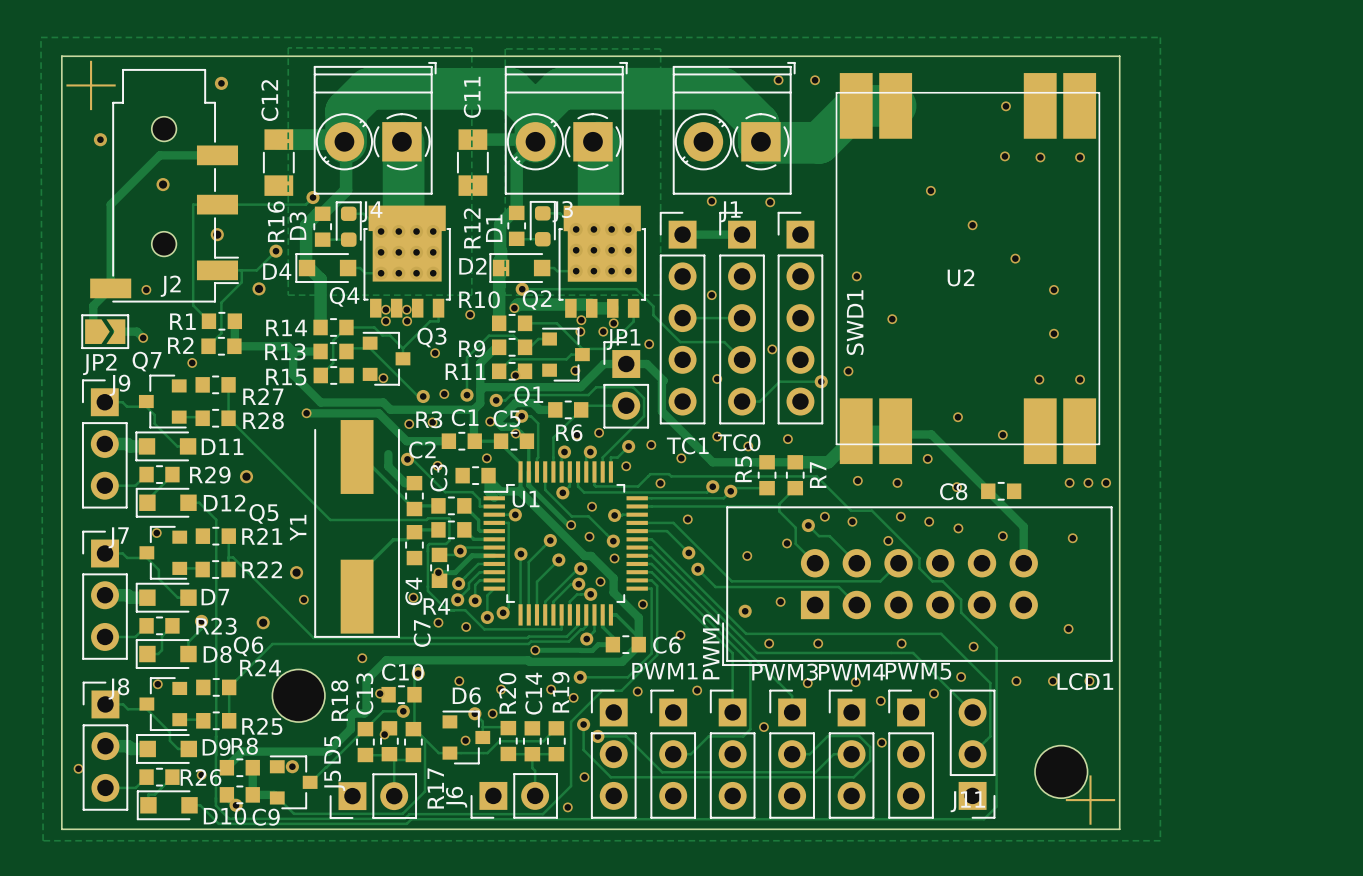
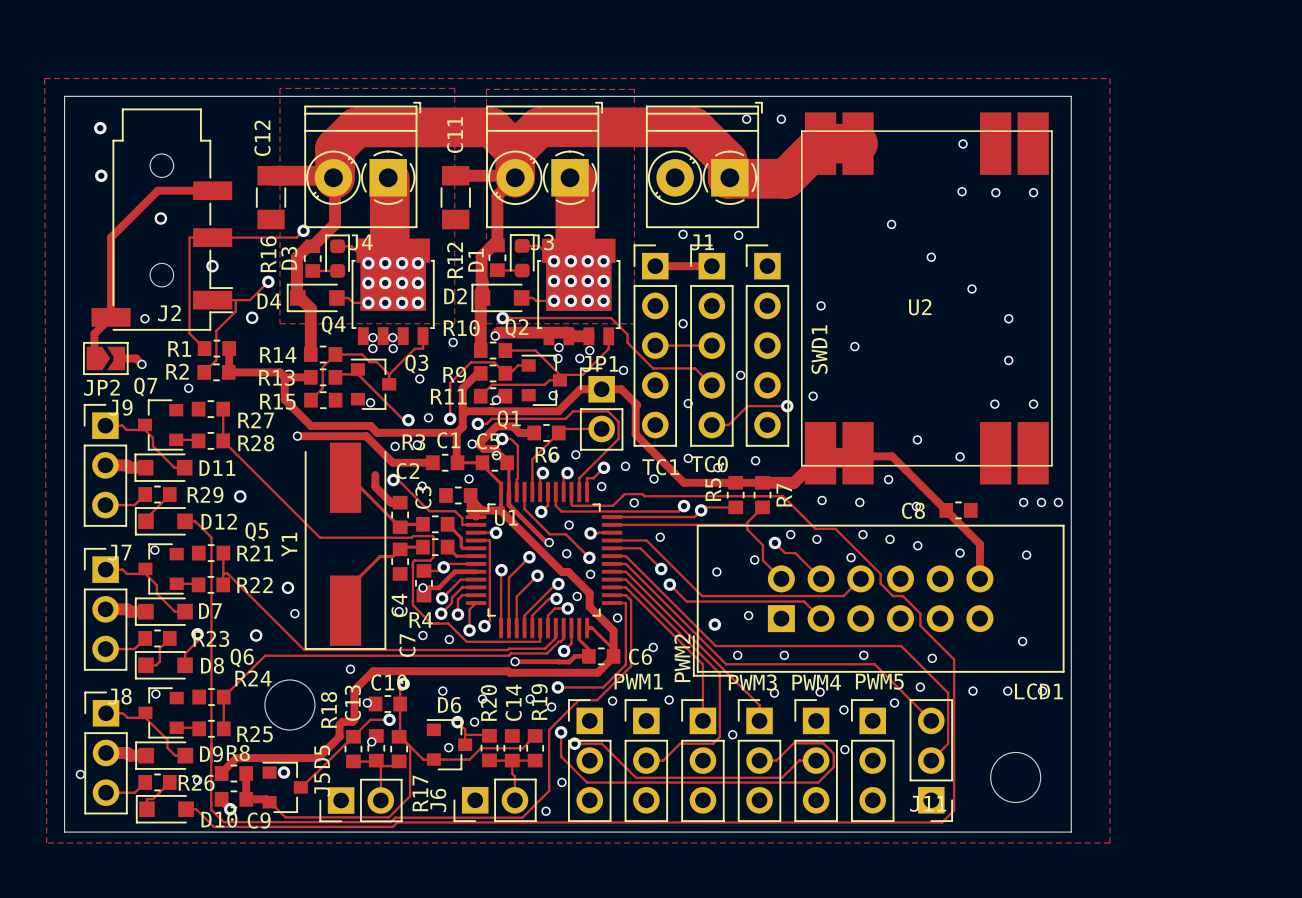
via: (221, 83) -> none
part: (91, 85) -> none
via: none -> (100, 128)
part: (1090, 800) -> none

